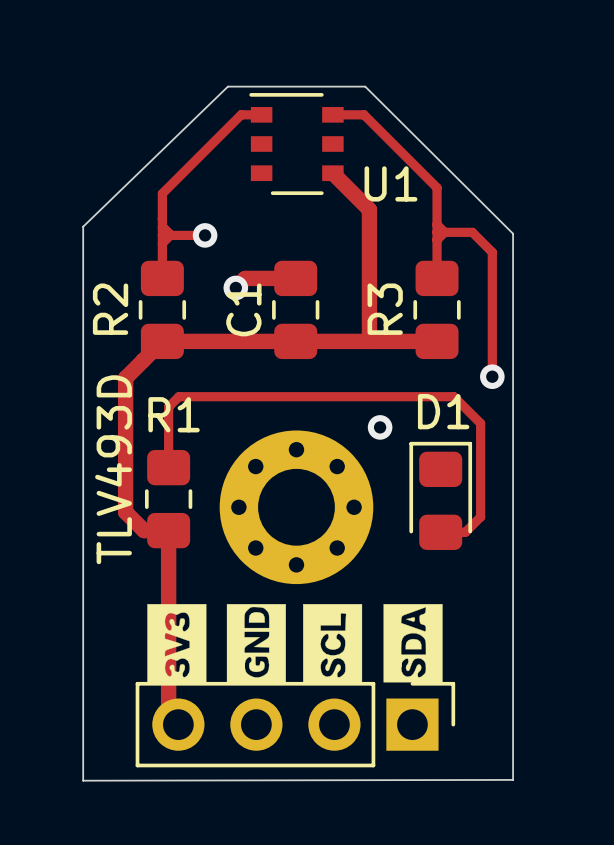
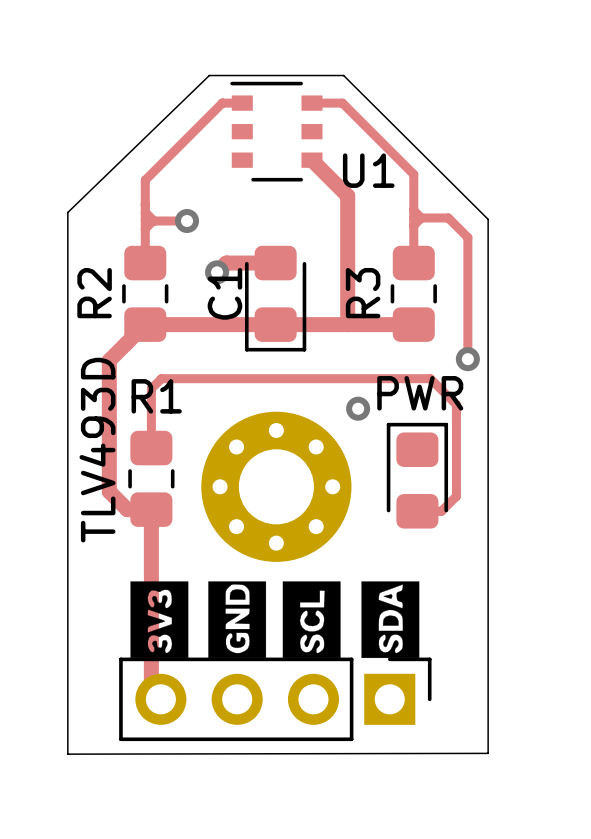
C1 footprint: [272, 260, 320, 360] -> [244, 245, 307, 352]
D1 name: D1 (443, 411) -> PWR (420, 393)

